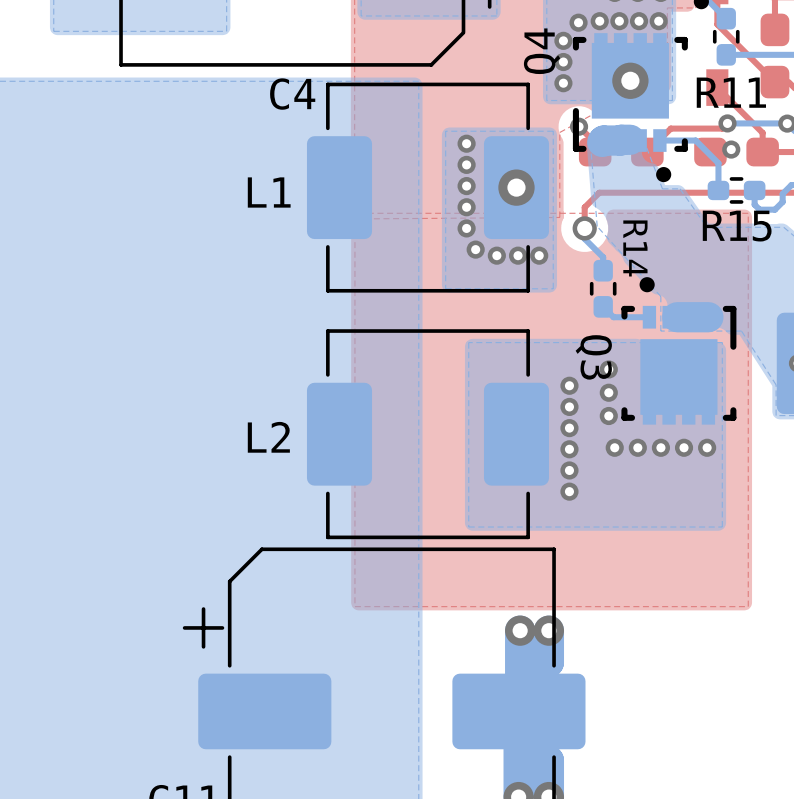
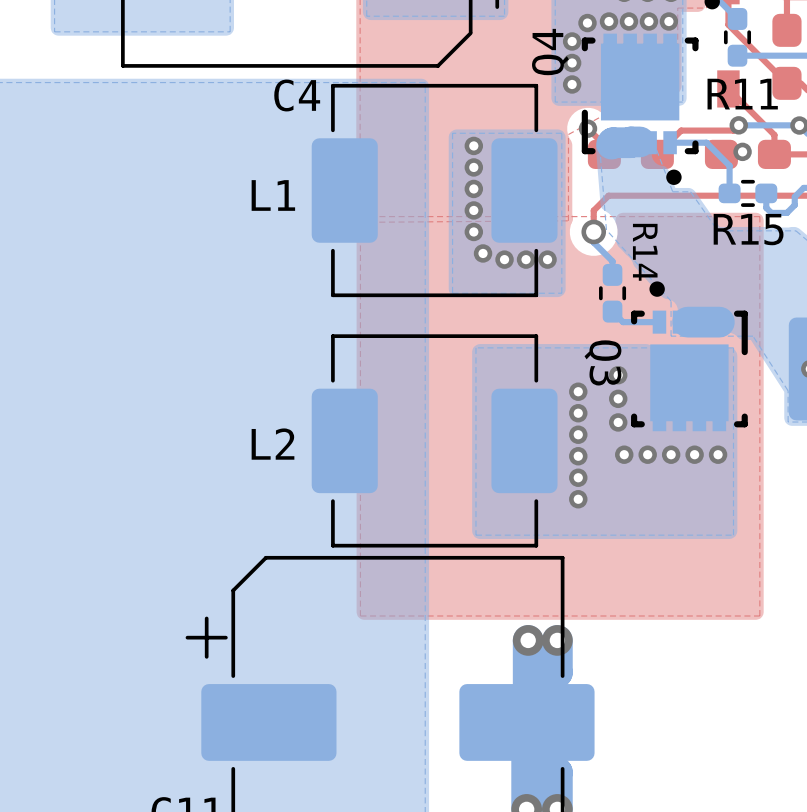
via: (630, 80) -> none
via: (516, 187) -> none

